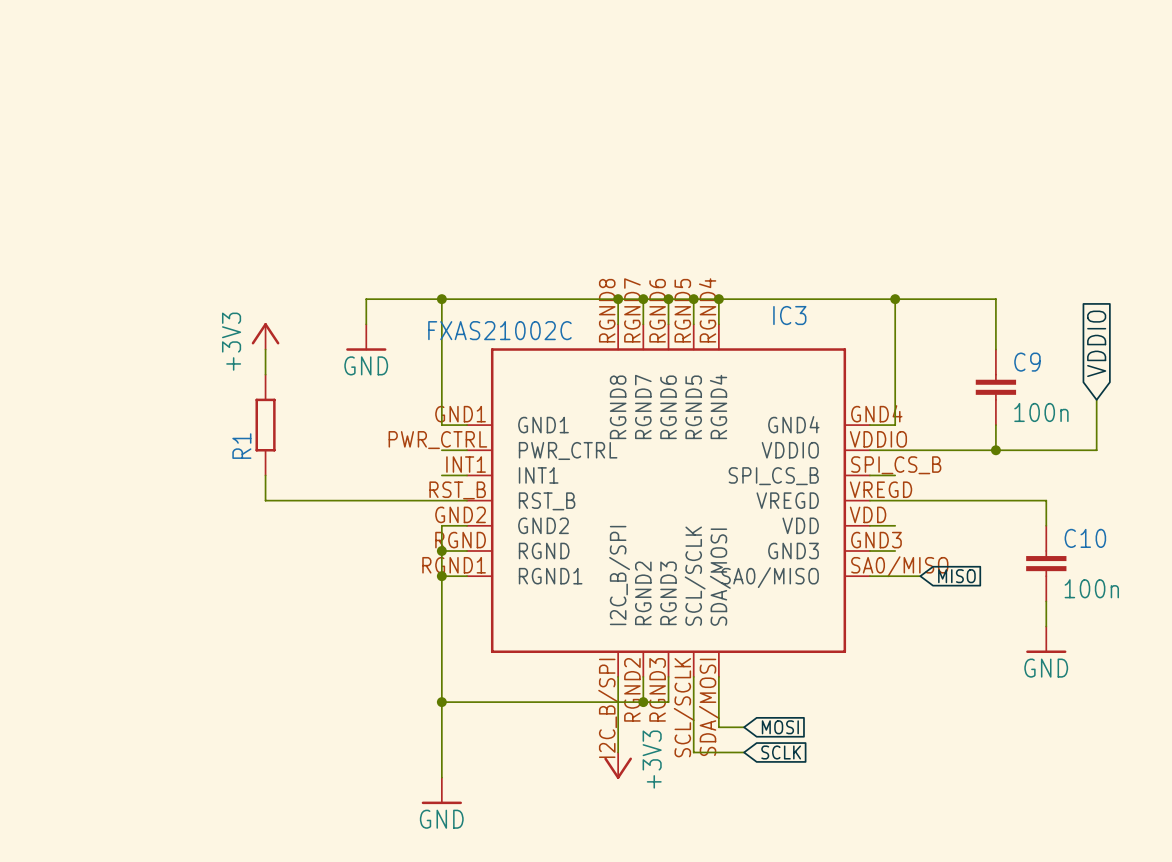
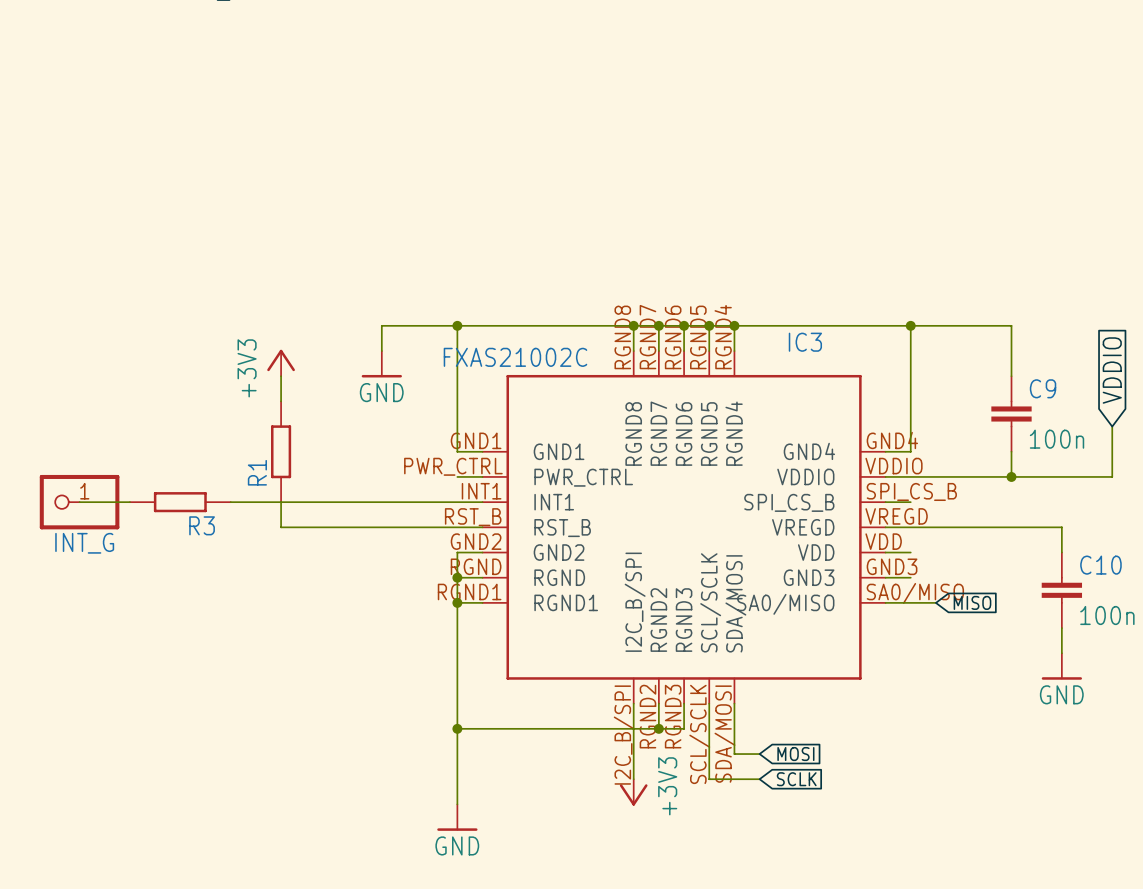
wire: none -> (79, 502) (129, 502)
INT_G: none -> (79, 502)
R3: none -> (180, 502)
wire: none -> (230, 502) (457, 502)

